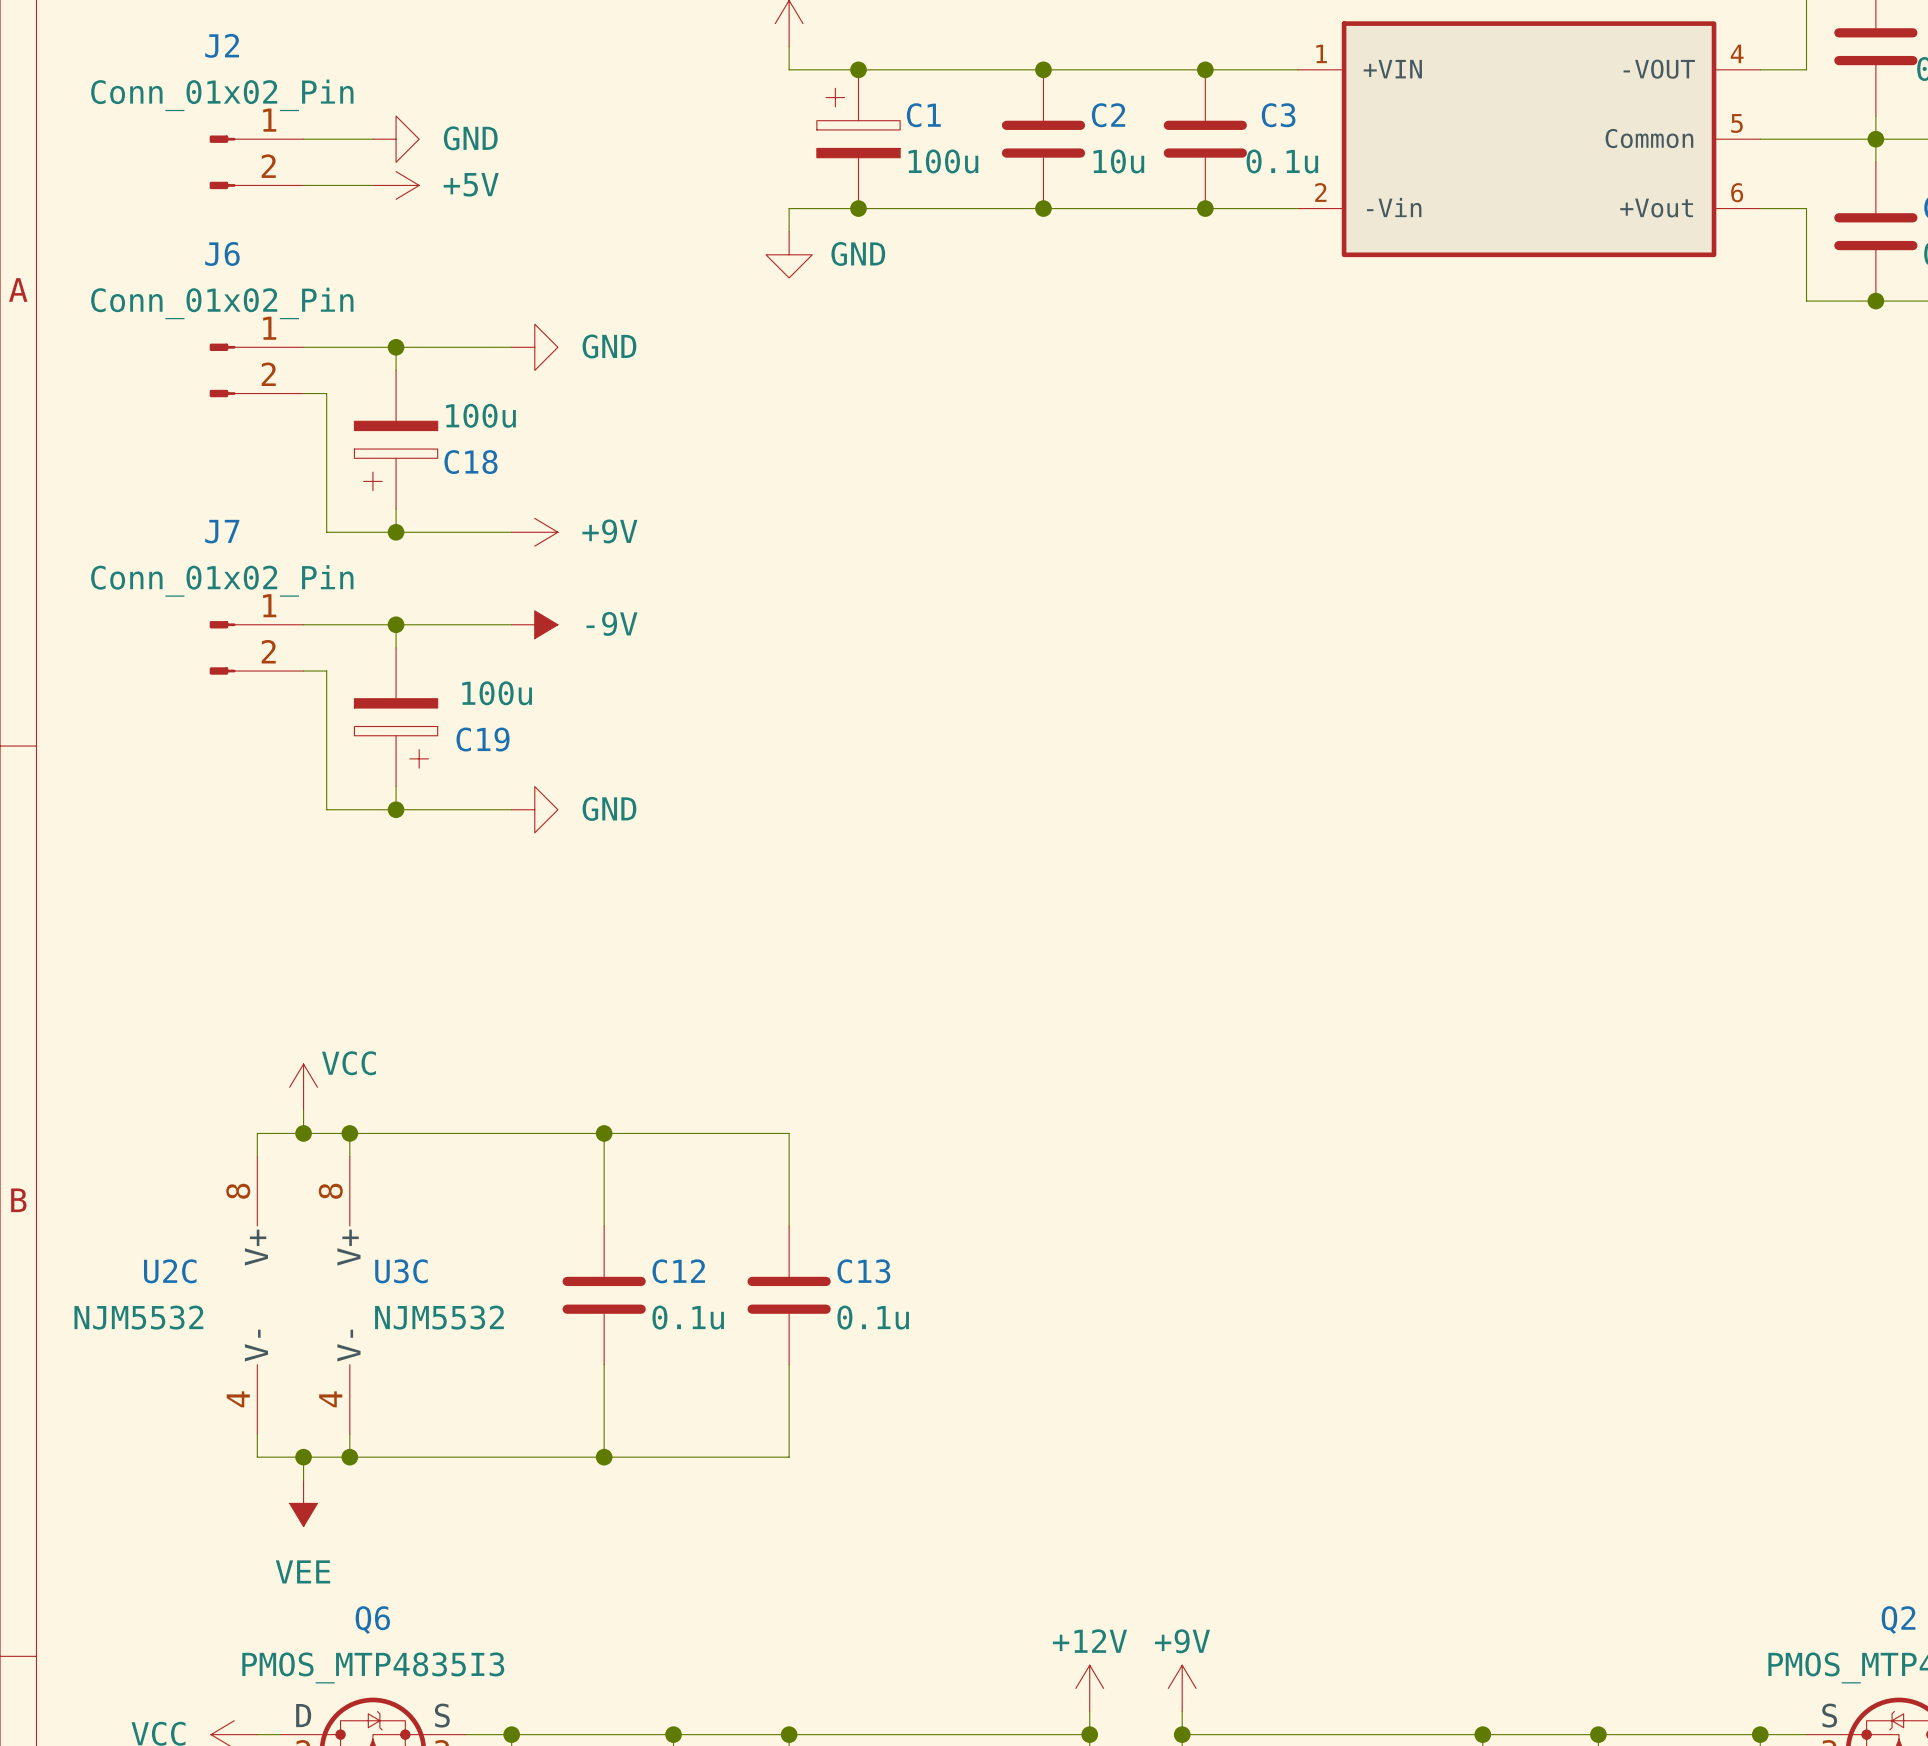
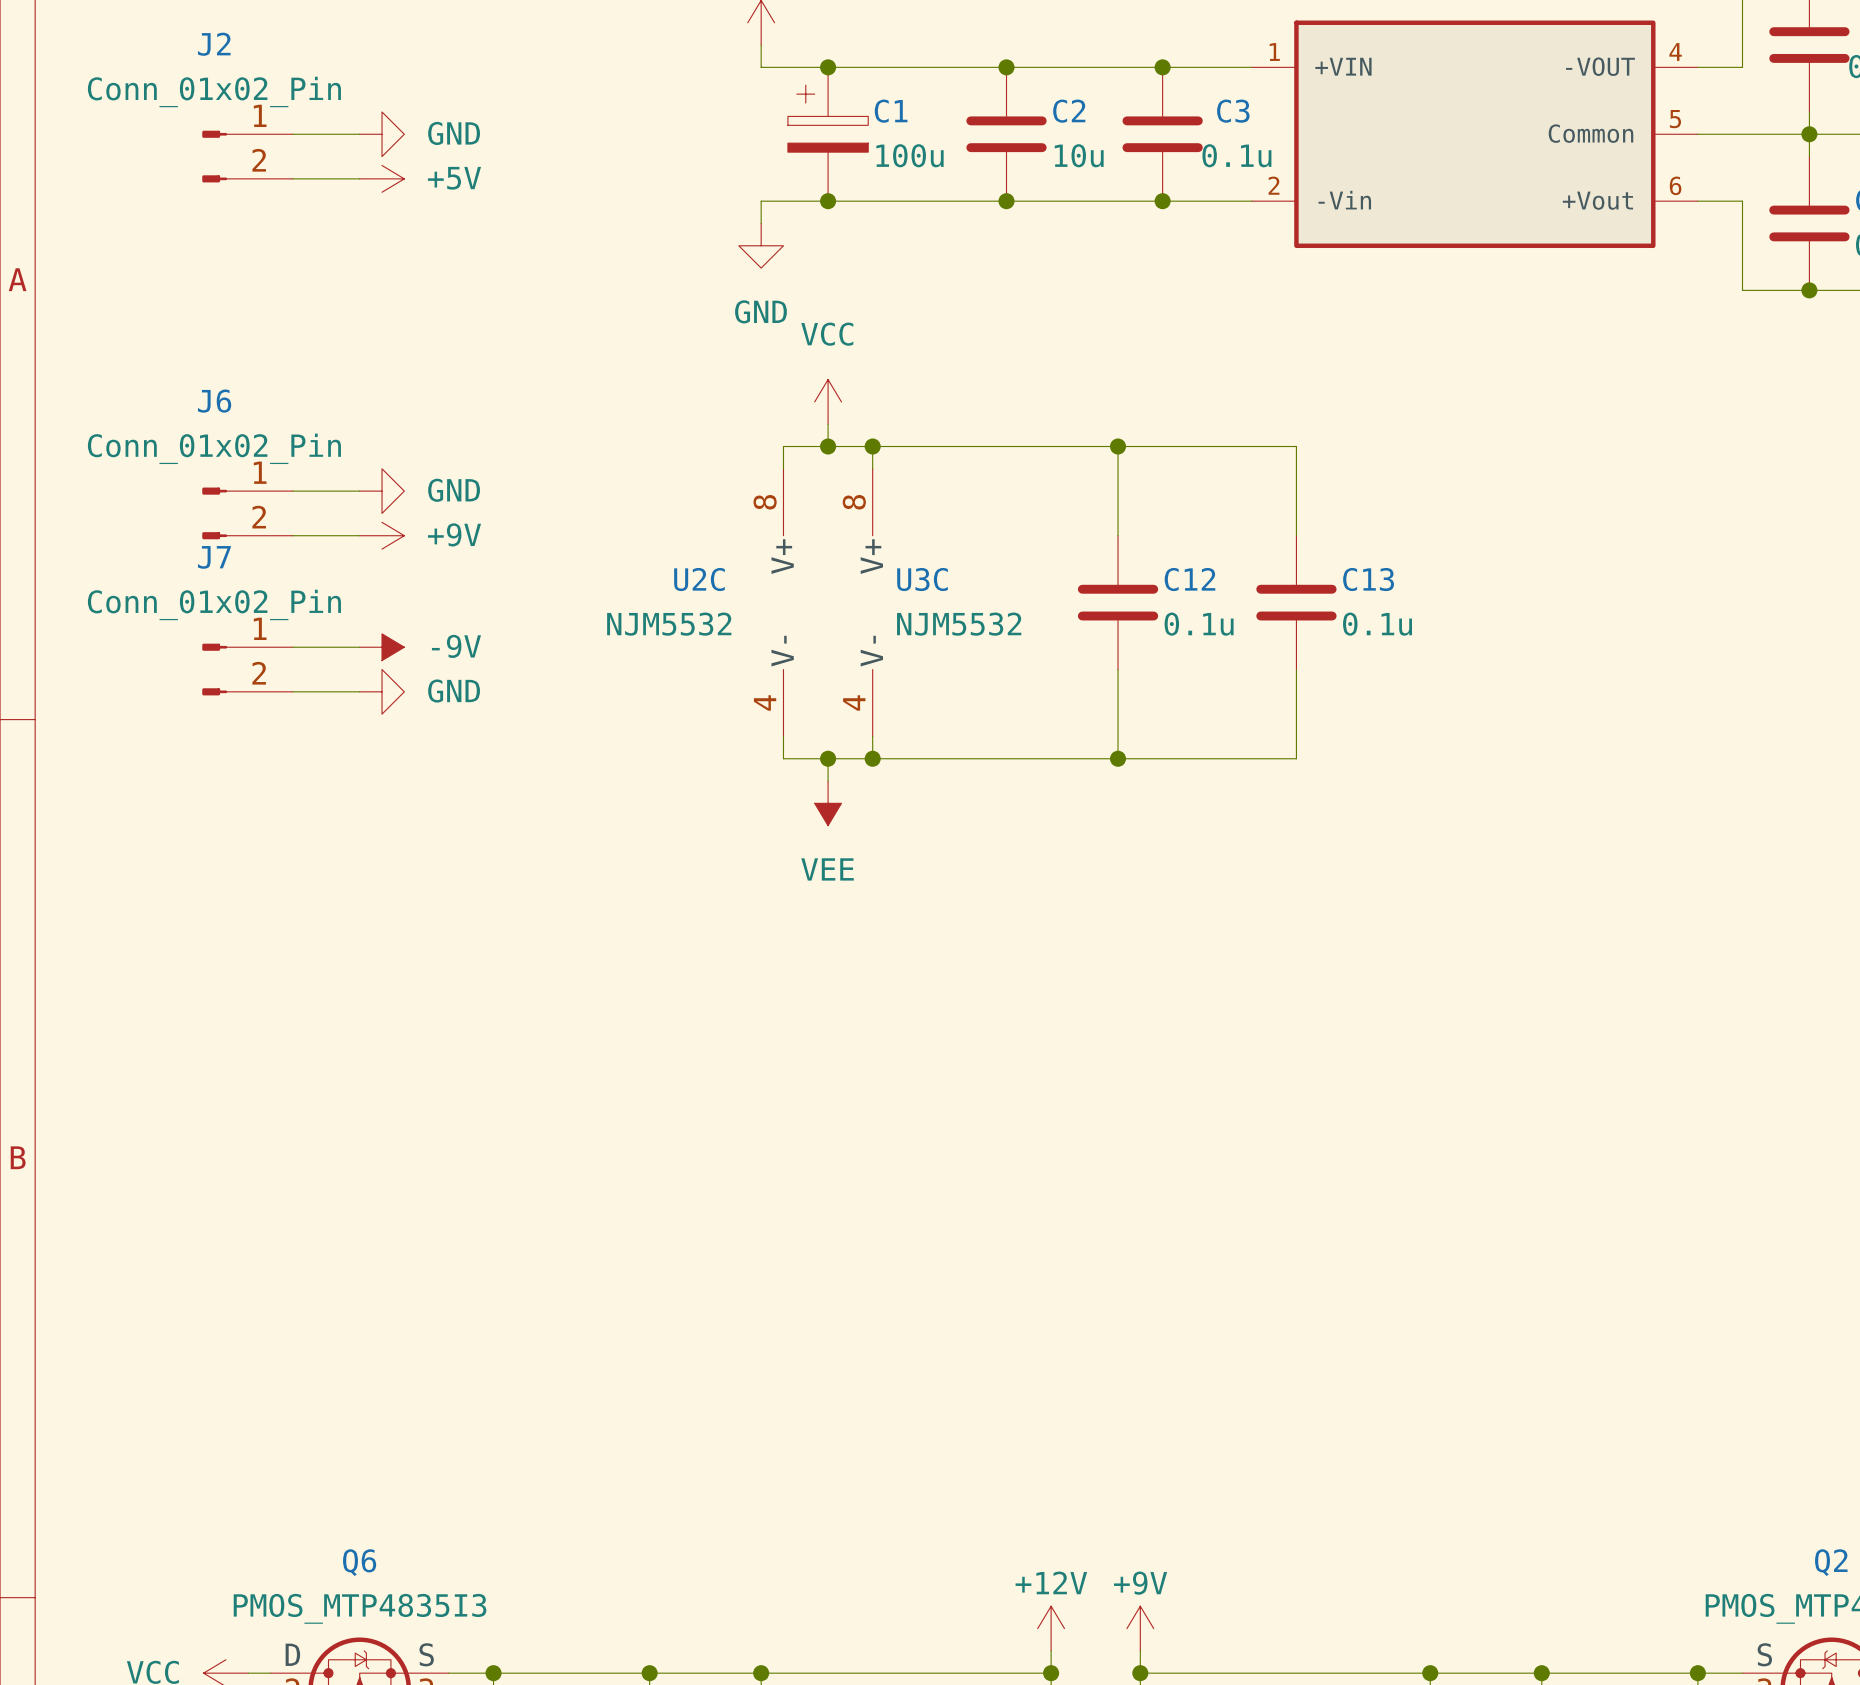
power symbol text position: GND (858, 253) -> GND (760, 311)
wire: (303, 347) (511, 347) -> none
wire: (396, 347) (396, 370) -> none
junction: (396, 347) -> none
power symbol: GND (534, 347) -> none
J6 position: (256, 370) -> (247, 513)
wire: (303, 393) (326, 393) (326, 532) (511, 532) -> none
power symbol: none -> VCC (828, 401)
C18: 100u (396, 439) -> none
wire: none -> (828, 424) (828, 446)
junction: none -> (828, 446)
wire: none -> (872, 446) (872, 468)
junction: none -> (872, 446)
wire: none -> (1118, 446) (1118, 535)
junction: none -> (1118, 446)
wire: none -> (783, 468) (783, 446) (1296, 446) (1296, 535)
wire: none -> (292, 491) (359, 491)
power symbol: none -> GND (382, 491)
junction: (396, 532) -> none
power symbol position: +9V (534, 532) -> +9V (382, 535)
wire: none -> (292, 535) (359, 535)
wire: (303, 624) (511, 624) -> none
wire: (396, 624) (396, 647) -> none
junction: (396, 624) -> none
power symbol position: -9V (534, 624) -> -9V (382, 647)
J7 position: (256, 647) -> (247, 669)
wire: (326, 671) (326, 809) (511, 809) -> (315, 647) (359, 647)
wire: none -> (1118, 669) (1118, 758)
wire: none -> (1296, 669) (1296, 758) (783, 758) (783, 736)
wire: none -> (292, 691) (359, 691)
power symbol: none -> GND (382, 691)
C19: 100u (396, 717) -> none
wire: none -> (872, 736) (872, 758)
wire: (396, 786) (396, 809) -> none
wire: none -> (828, 758) (828, 781)
junction: none -> (828, 758)
junction: none -> (872, 758)
junction: none -> (1118, 758)
junction: (396, 809) -> none
power symbol: GND (534, 809) -> none
power symbol: none -> VEE (828, 803)
power symbol: VCC (303, 1087) -> none
wire: (303, 1110) (303, 1133) -> none
junction: (303, 1133) -> none
wire: (349, 1133) (349, 1156) -> none
junction: (349, 1133) -> none
wire: (604, 1133) (604, 1225) -> none
junction: (604, 1133) -> none
wire: (257, 1156) (257, 1133) (789, 1133) (789, 1225) -> none
U2C position: (257, 1295) -> (783, 602)
U3C position: (349, 1295) -> (872, 602)
C12 position: (604, 1295) -> (1118, 602)
C13 position: (789, 1295) -> (1296, 602)
wire: (604, 1364) (604, 1457) -> none
wire: (789, 1364) (789, 1457) (257, 1457) (257, 1434) -> none
wire: (349, 1434) (349, 1457) -> none
wire: (303, 1457) (303, 1480) -> none
junction: (303, 1457) -> none
junction: (349, 1457) -> none
junction: (604, 1457) -> none
power symbol: VEE (303, 1503) -> none

